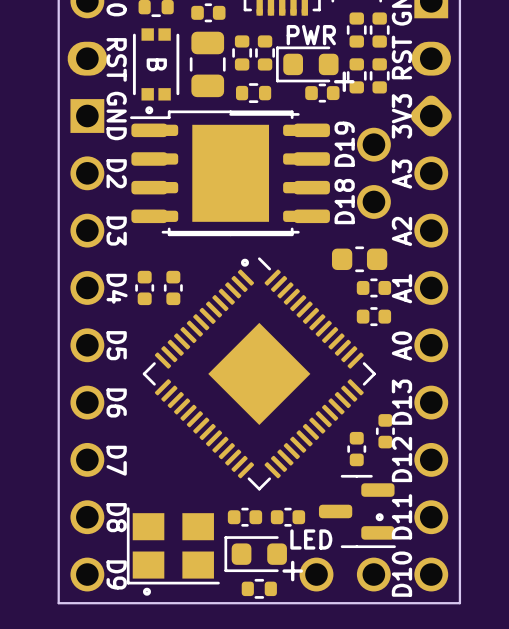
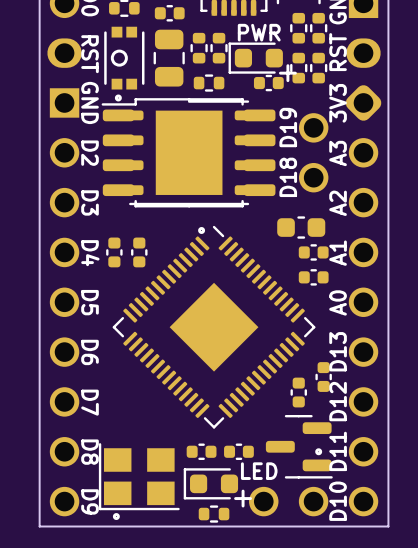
drawing: none -> [110, 49, 128, 67]
text: B (156, 64) -> none

